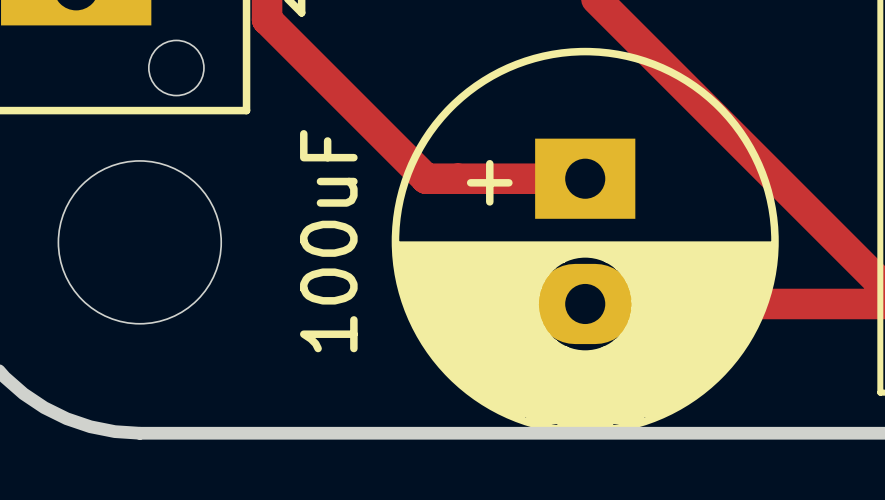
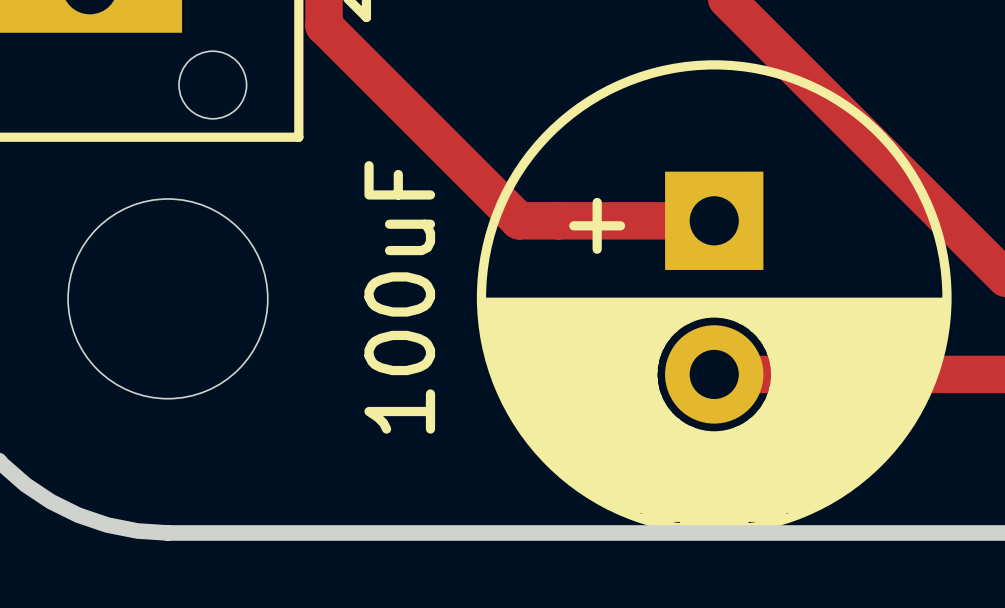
part footprint: [391, 47, 779, 435] -> [476, 60, 952, 535]

